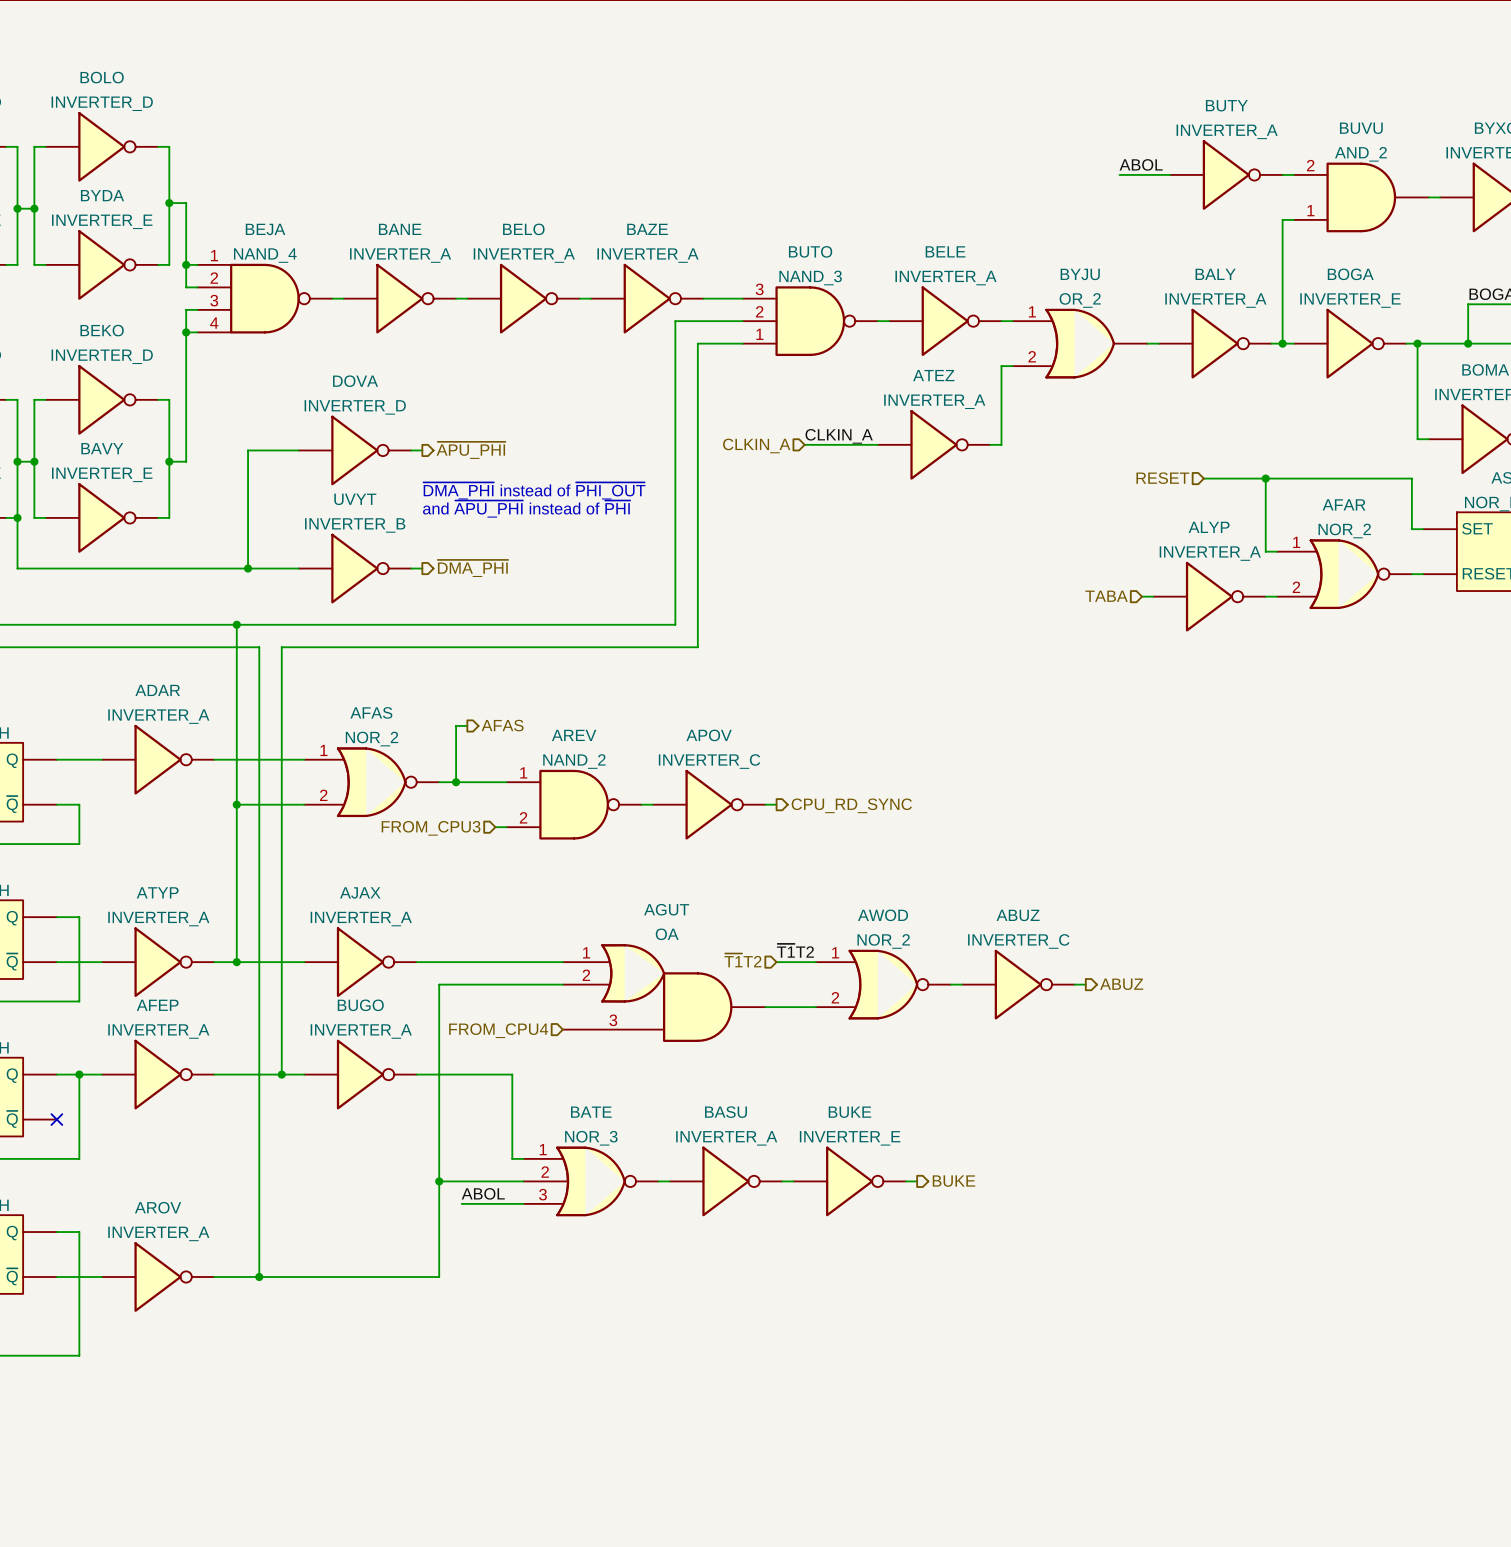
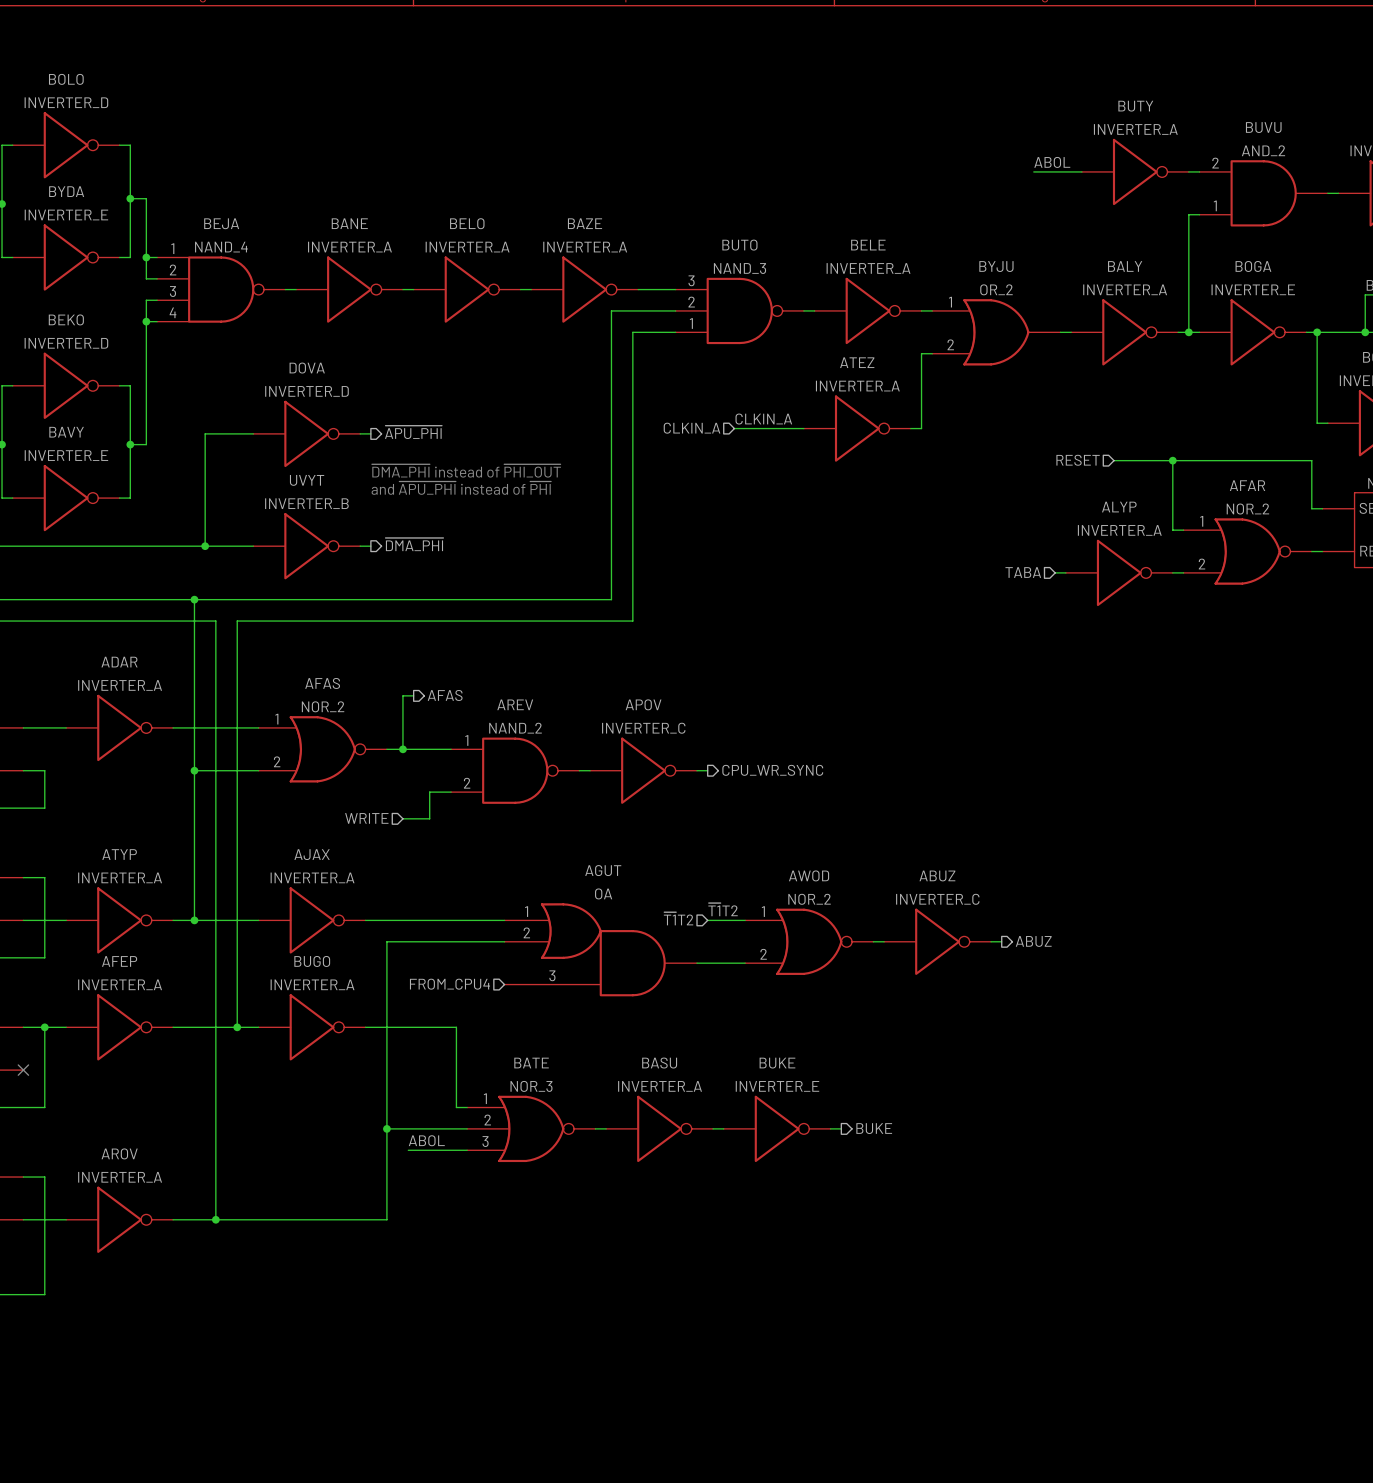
hierarchical label: CPU_RD_SYNC (851, 805) -> CPU_WR_SYNC (772, 770)
wire: none -> (440, 792) (429, 792) (429, 818) (402, 818)
hierarchical label: FROM_CPU3 (431, 828) -> none
hierarchical label: none -> WRITE (366, 818)

